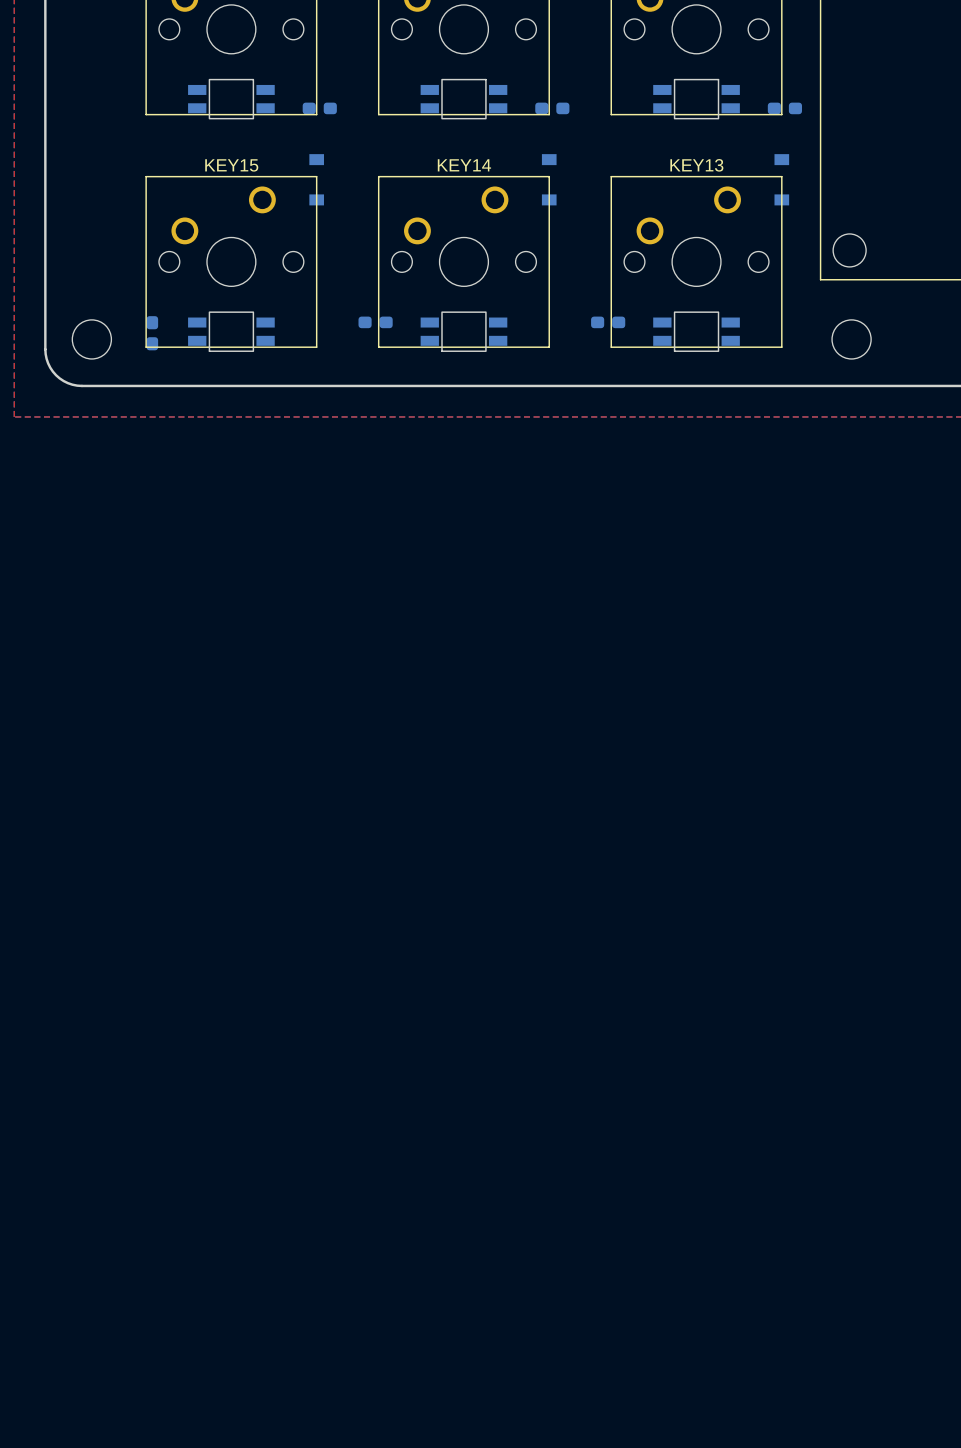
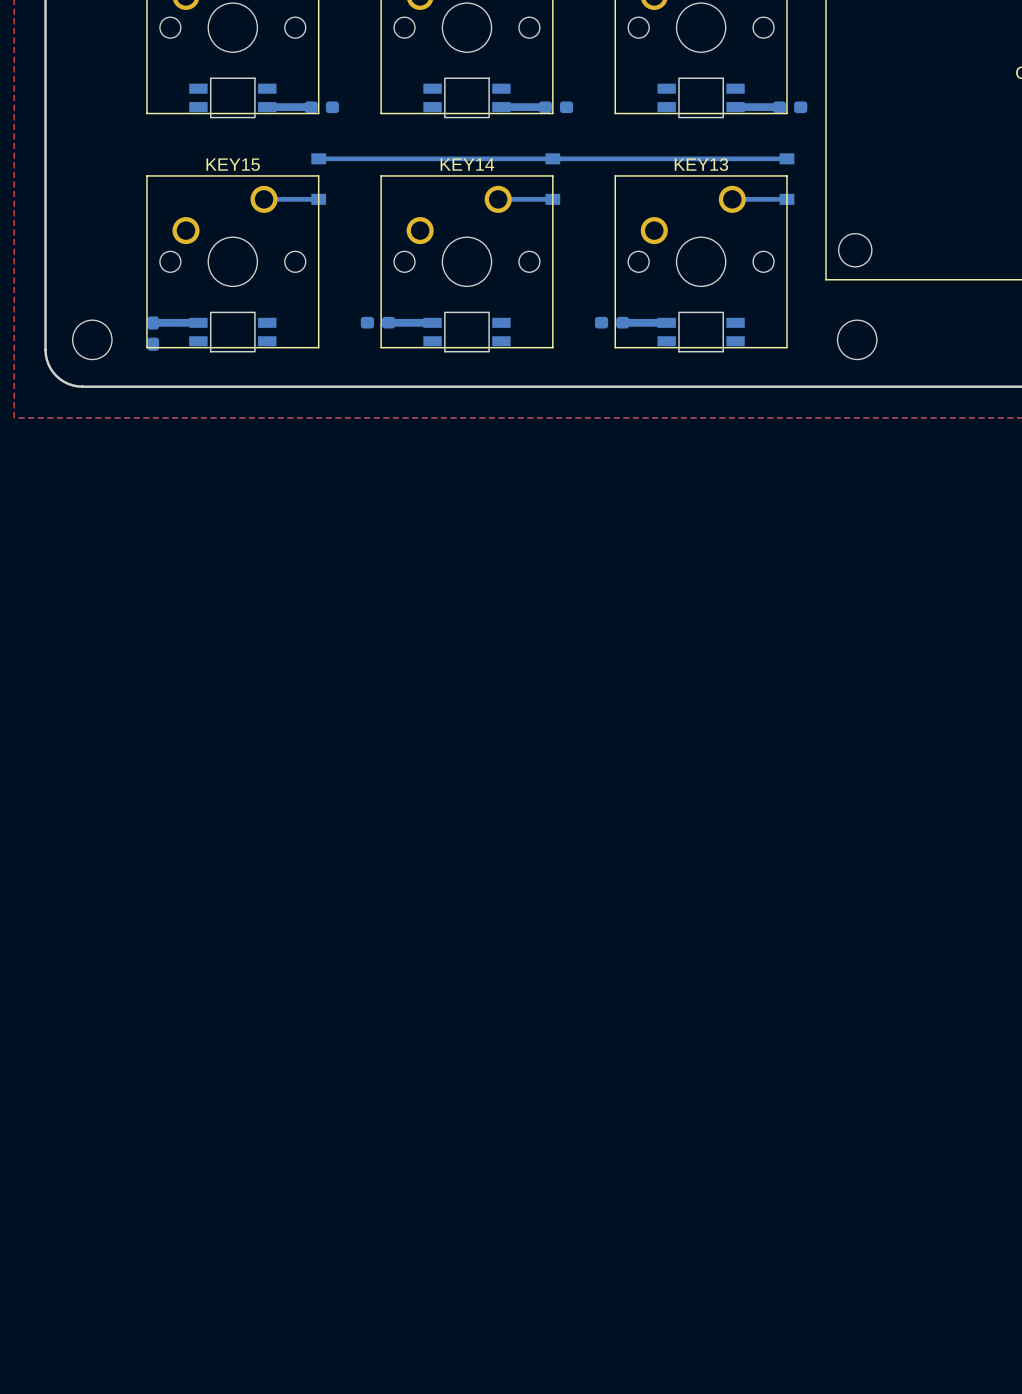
bottom track: none -> (267, 107) (311, 107)
bottom track: none -> (501, 107) (545, 107)
bottom track: none -> (735, 107) (779, 107)
bottom track: none -> (318, 158) (786, 158)
bottom track: none -> (264, 199) (318, 199)
bottom track: none -> (498, 199) (552, 199)
bottom track: none -> (732, 199) (786, 199)
bottom track: none -> (198, 322) (153, 323)
bottom track: none -> (388, 322) (432, 322)
bottom track: none -> (622, 322) (666, 322)

